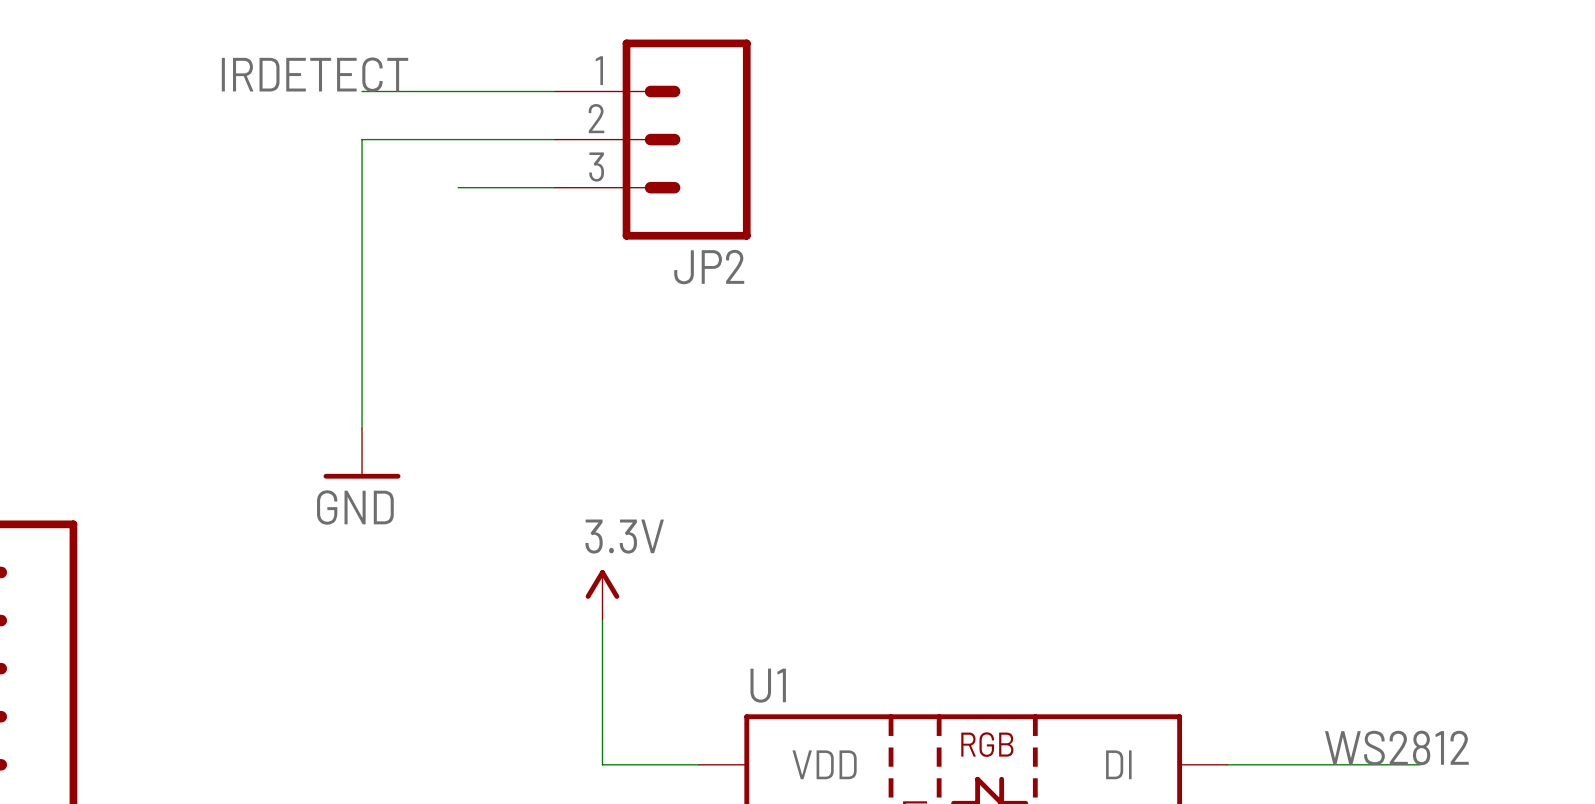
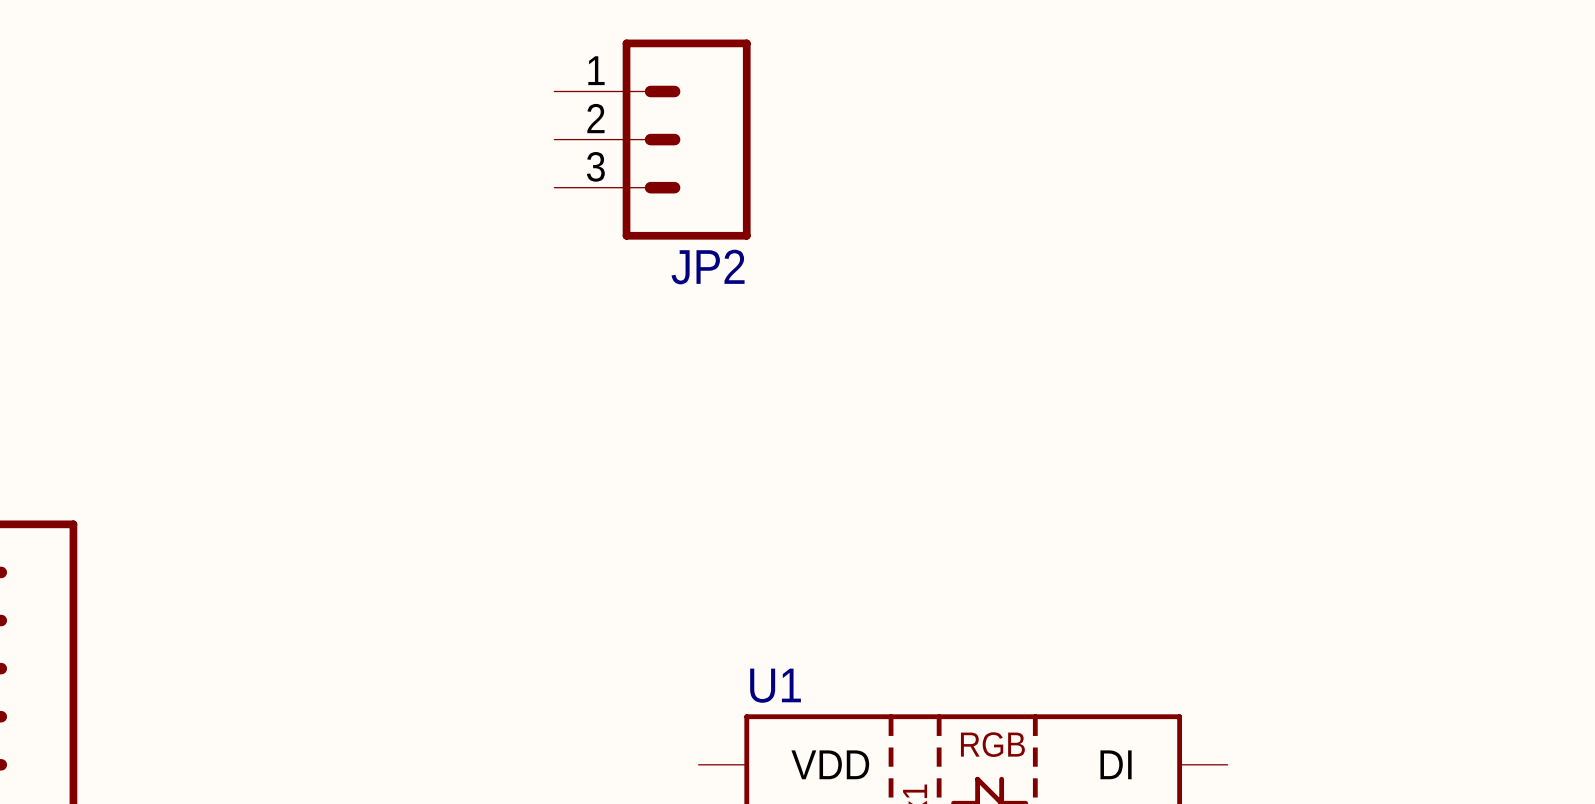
label: IRDETECT (315, 74) -> none
wire: (362, 91) (554, 91) -> none
wire: (554, 139) (362, 139) (362, 428) -> none
wire: (458, 187) (554, 187) -> none
power symbol: GND (362, 453) -> none
power symbol: 3.3V (602, 595) -> none
wire: (602, 620) (602, 764) (698, 764) -> none
label: WS2812 (1396, 747) -> none
wire: (1227, 764) (1420, 764) -> none

